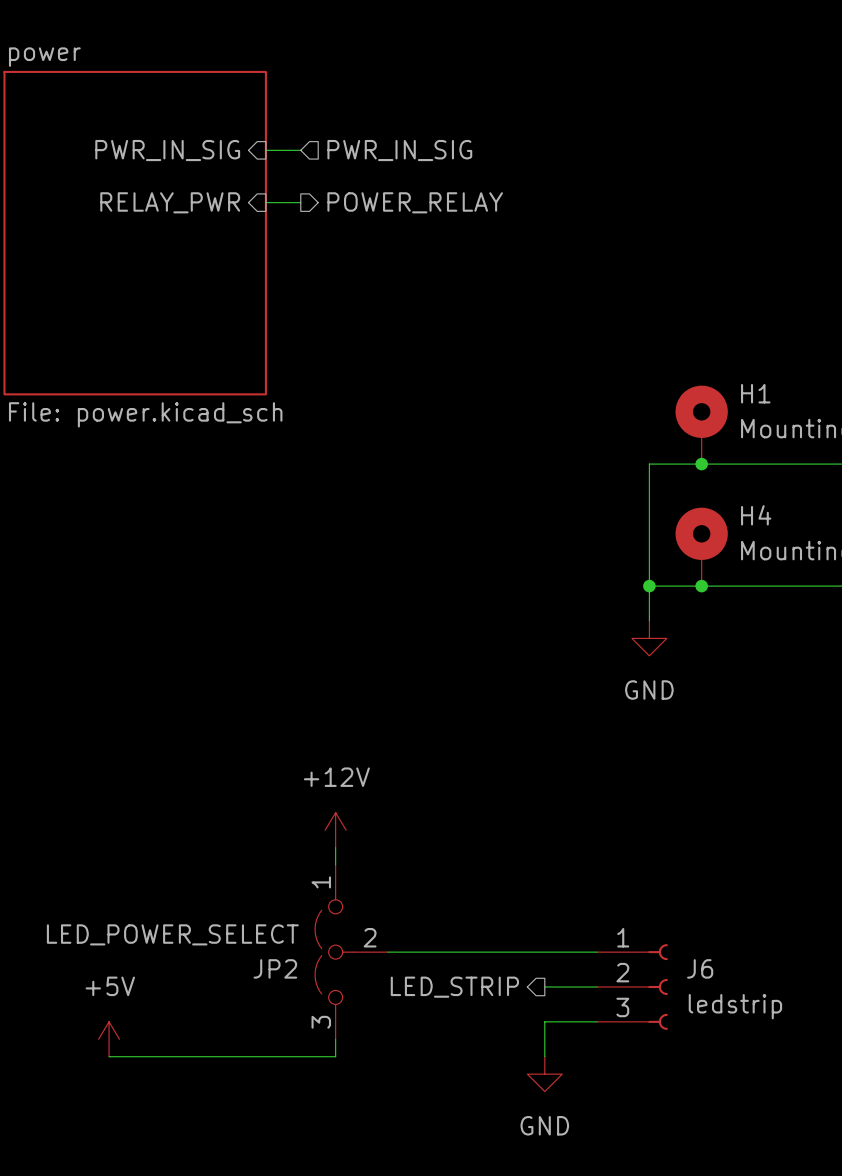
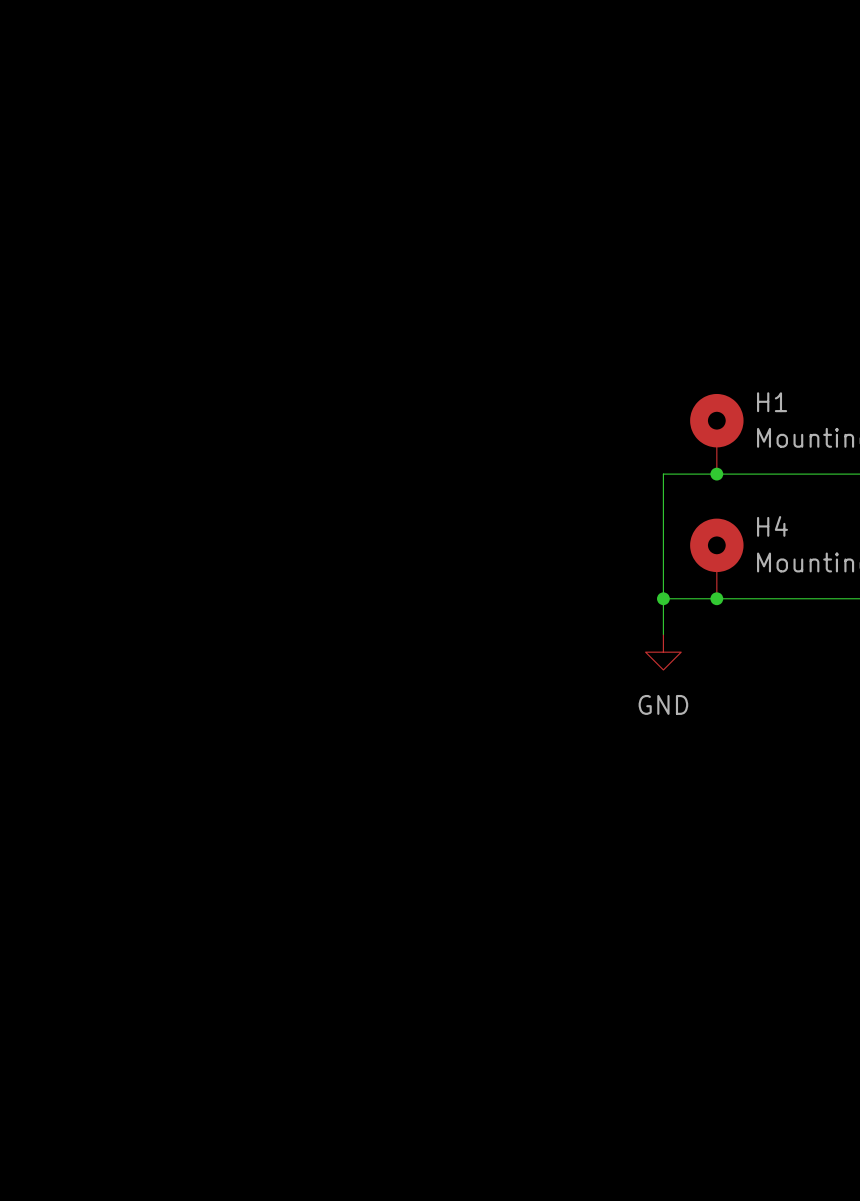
sheet pin: PWR_IN_SIG (167, 150) -> none
wire: (265, 150) (300, 150) -> none
hierarchical label: PWR_IN_SIG (399, 150) -> none
sheet pin: RELAY_PWR (170, 202) -> none
wire: (265, 202) (300, 202) -> none
hierarchical label: POWER_RELAY (415, 202) -> none
sheet power: File: power.kicad_sch (135, 233) -> none
power symbol: +12V (335, 830) -> none
wire: (335, 847) (335, 864) -> none
JP2: LED_POWER_SELECT (351, 952) -> none
wire: (387, 952) (597, 952) -> none
wire: (544, 986) (597, 986) -> none
J6: ledstrip (632, 986) -> none
hierarchical label: LED_STRIP (454, 987) -> none
wire: (597, 1021) (544, 1021) (544, 1056) -> none
power symbol: +5V (109, 1039) -> none
wire: (335, 1039) (335, 1056) (109, 1056) -> none
power symbol: GND (544, 1074) -> none

